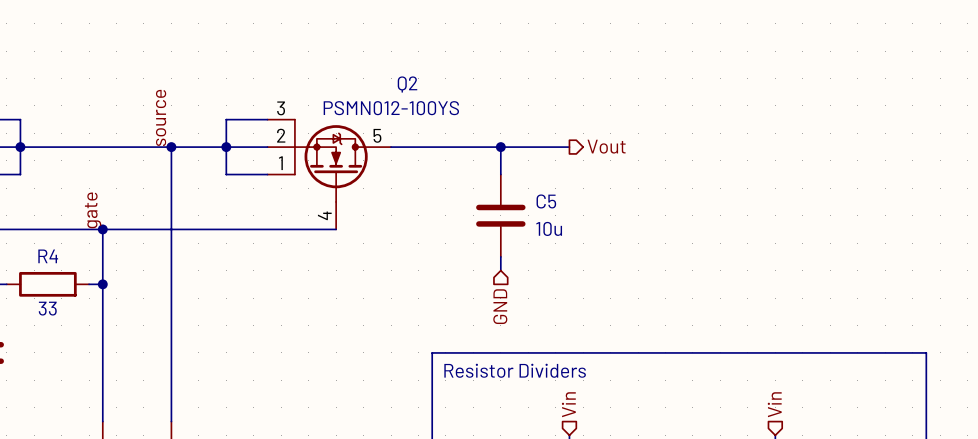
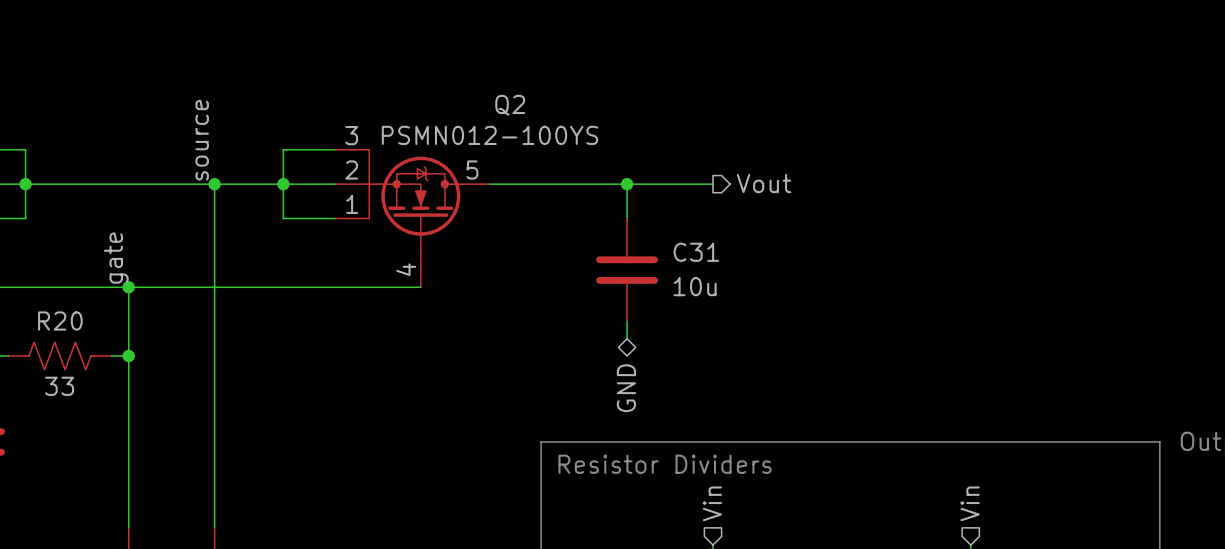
C5 name: C5 (546, 201) -> C31 (696, 252)
R4: 33 (47, 284) -> none
R20: none -> 33 (59, 356)
hierarchical label shape: input (500, 306) -> bidirectional (626, 388)

